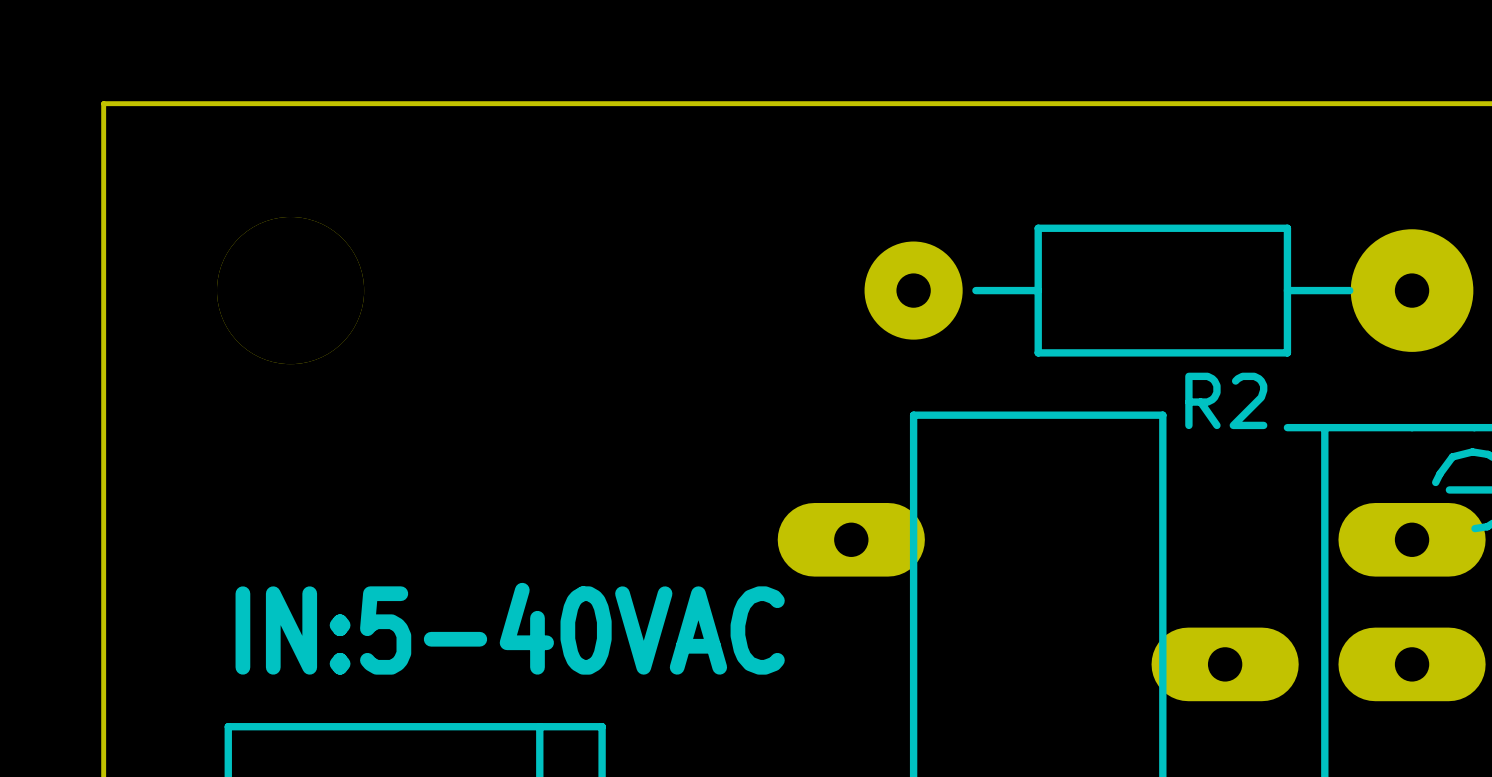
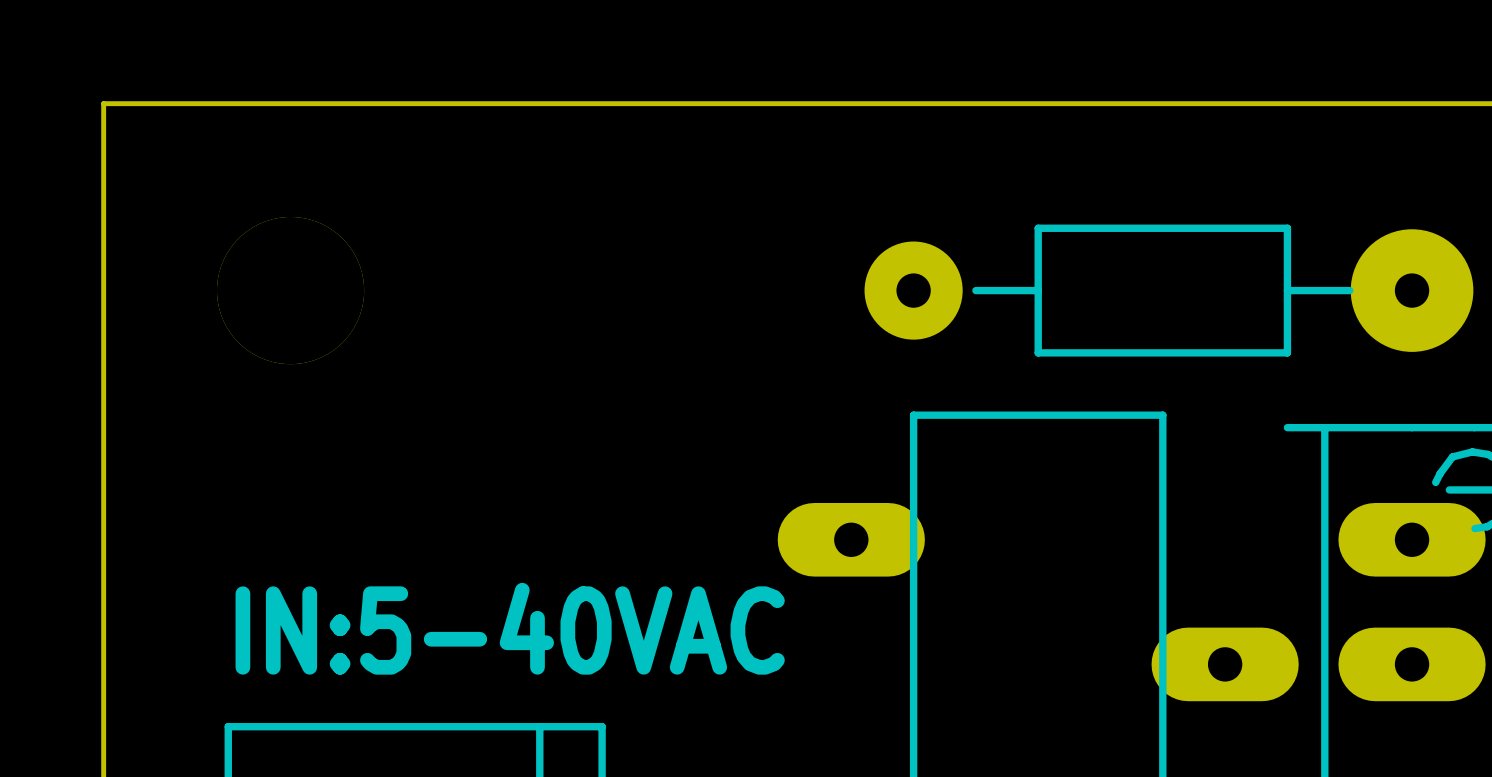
R2 name: R2 (1226, 400) -> none

